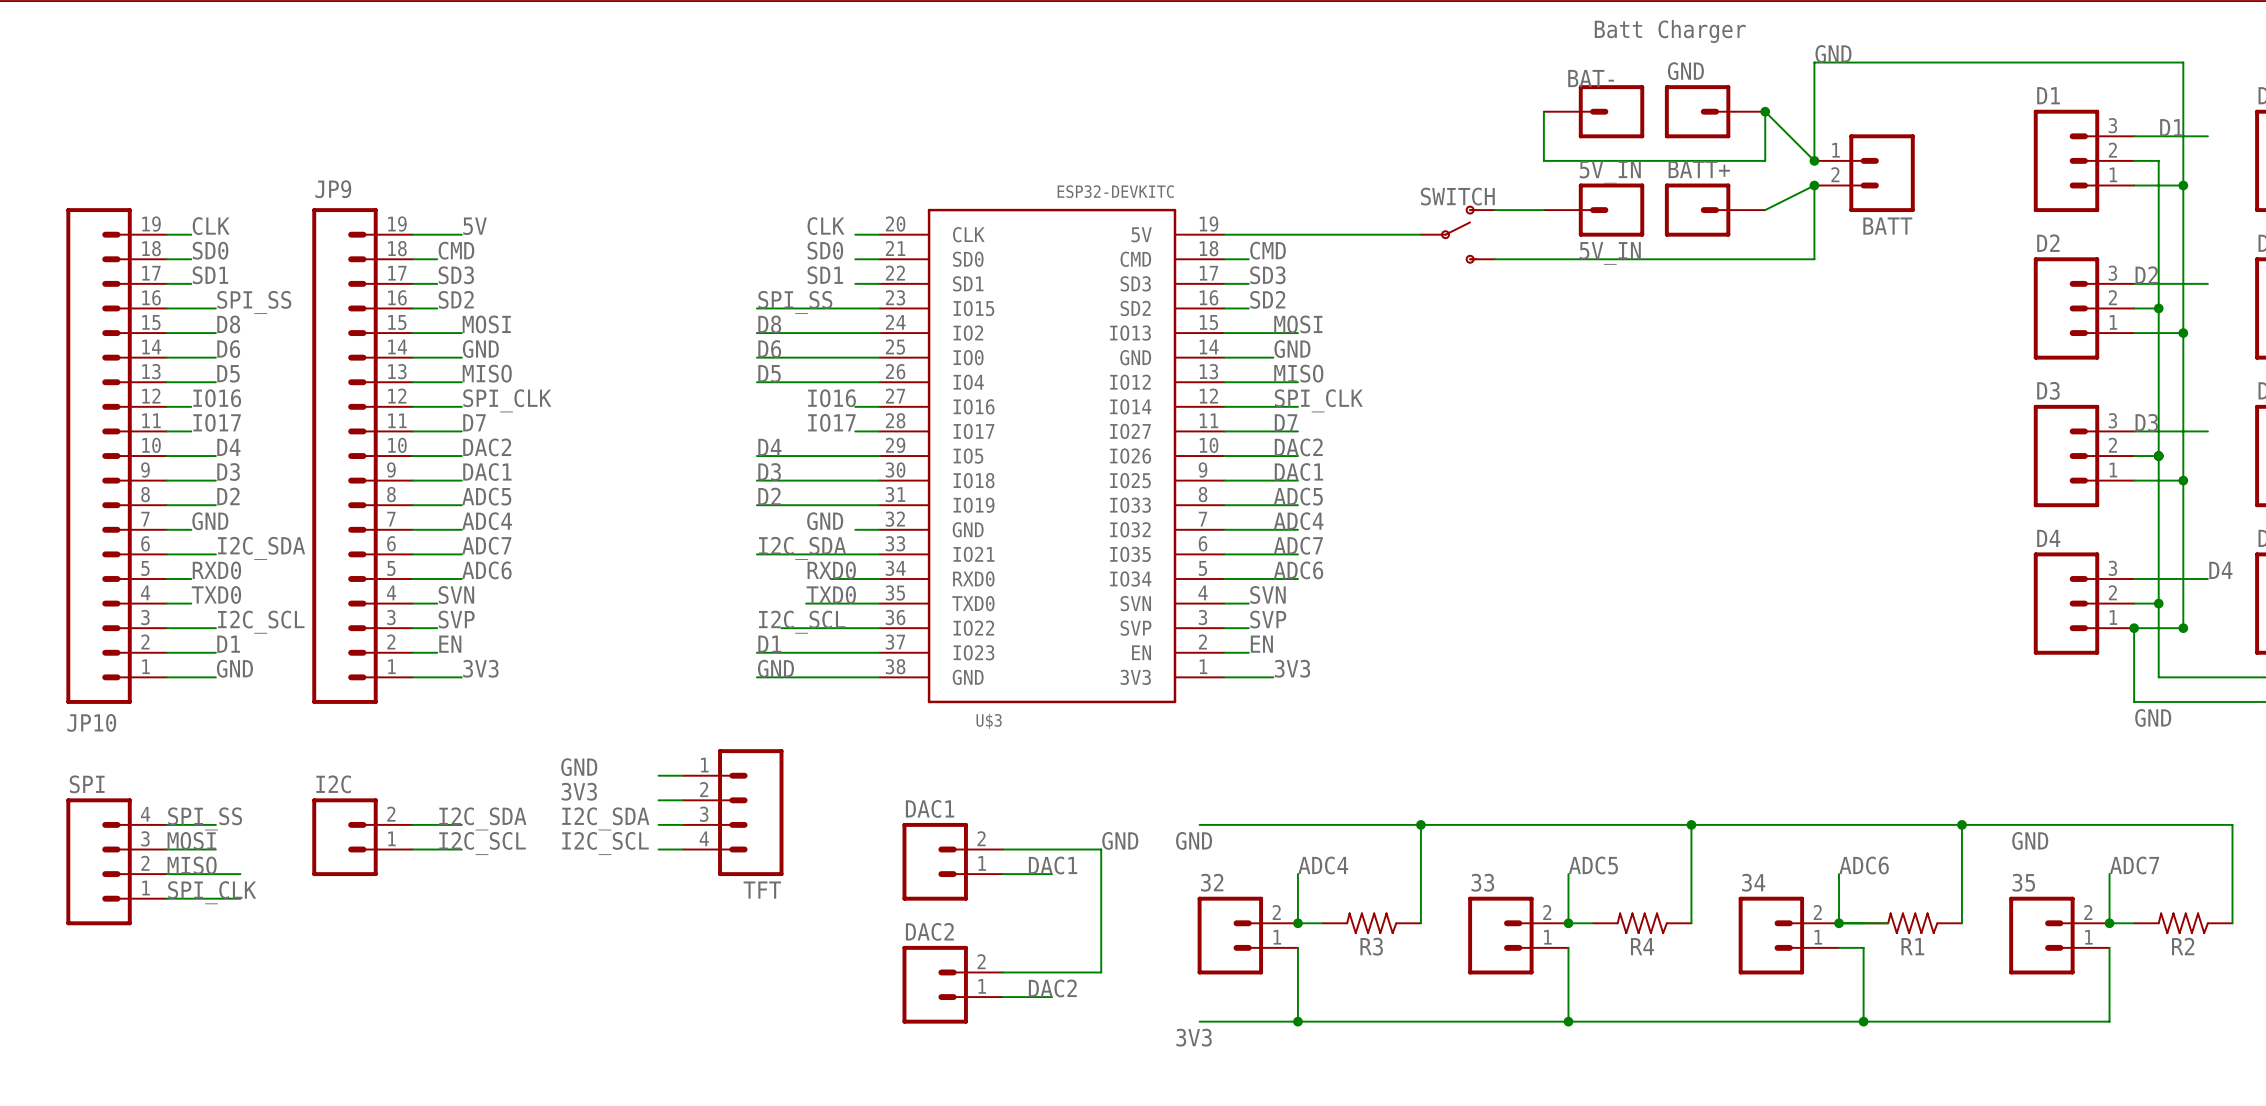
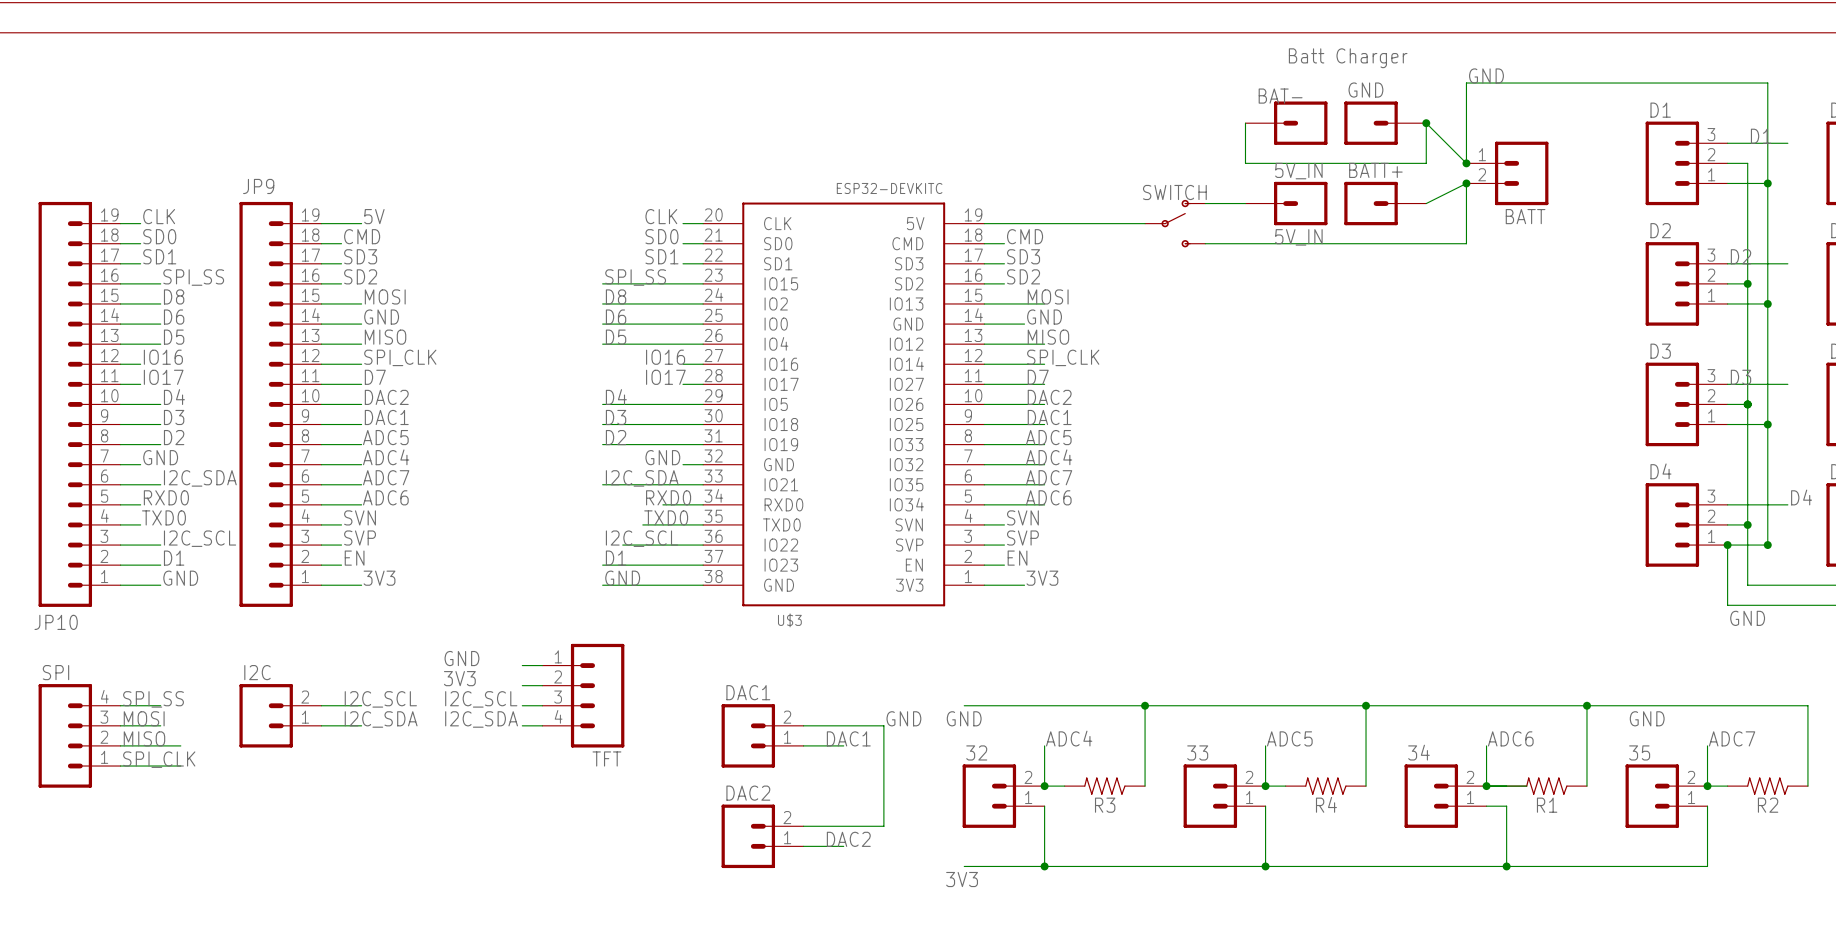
label: I2C_SDA (482, 818) -> I2C_SCL (380, 699)
label: I2C_SDA (605, 818) -> I2C_SCL (481, 699)
label: I2C_SCL (482, 843) -> I2C_SDA (381, 719)
label: I2C_SCL (605, 843) -> I2C_SDA (481, 719)

